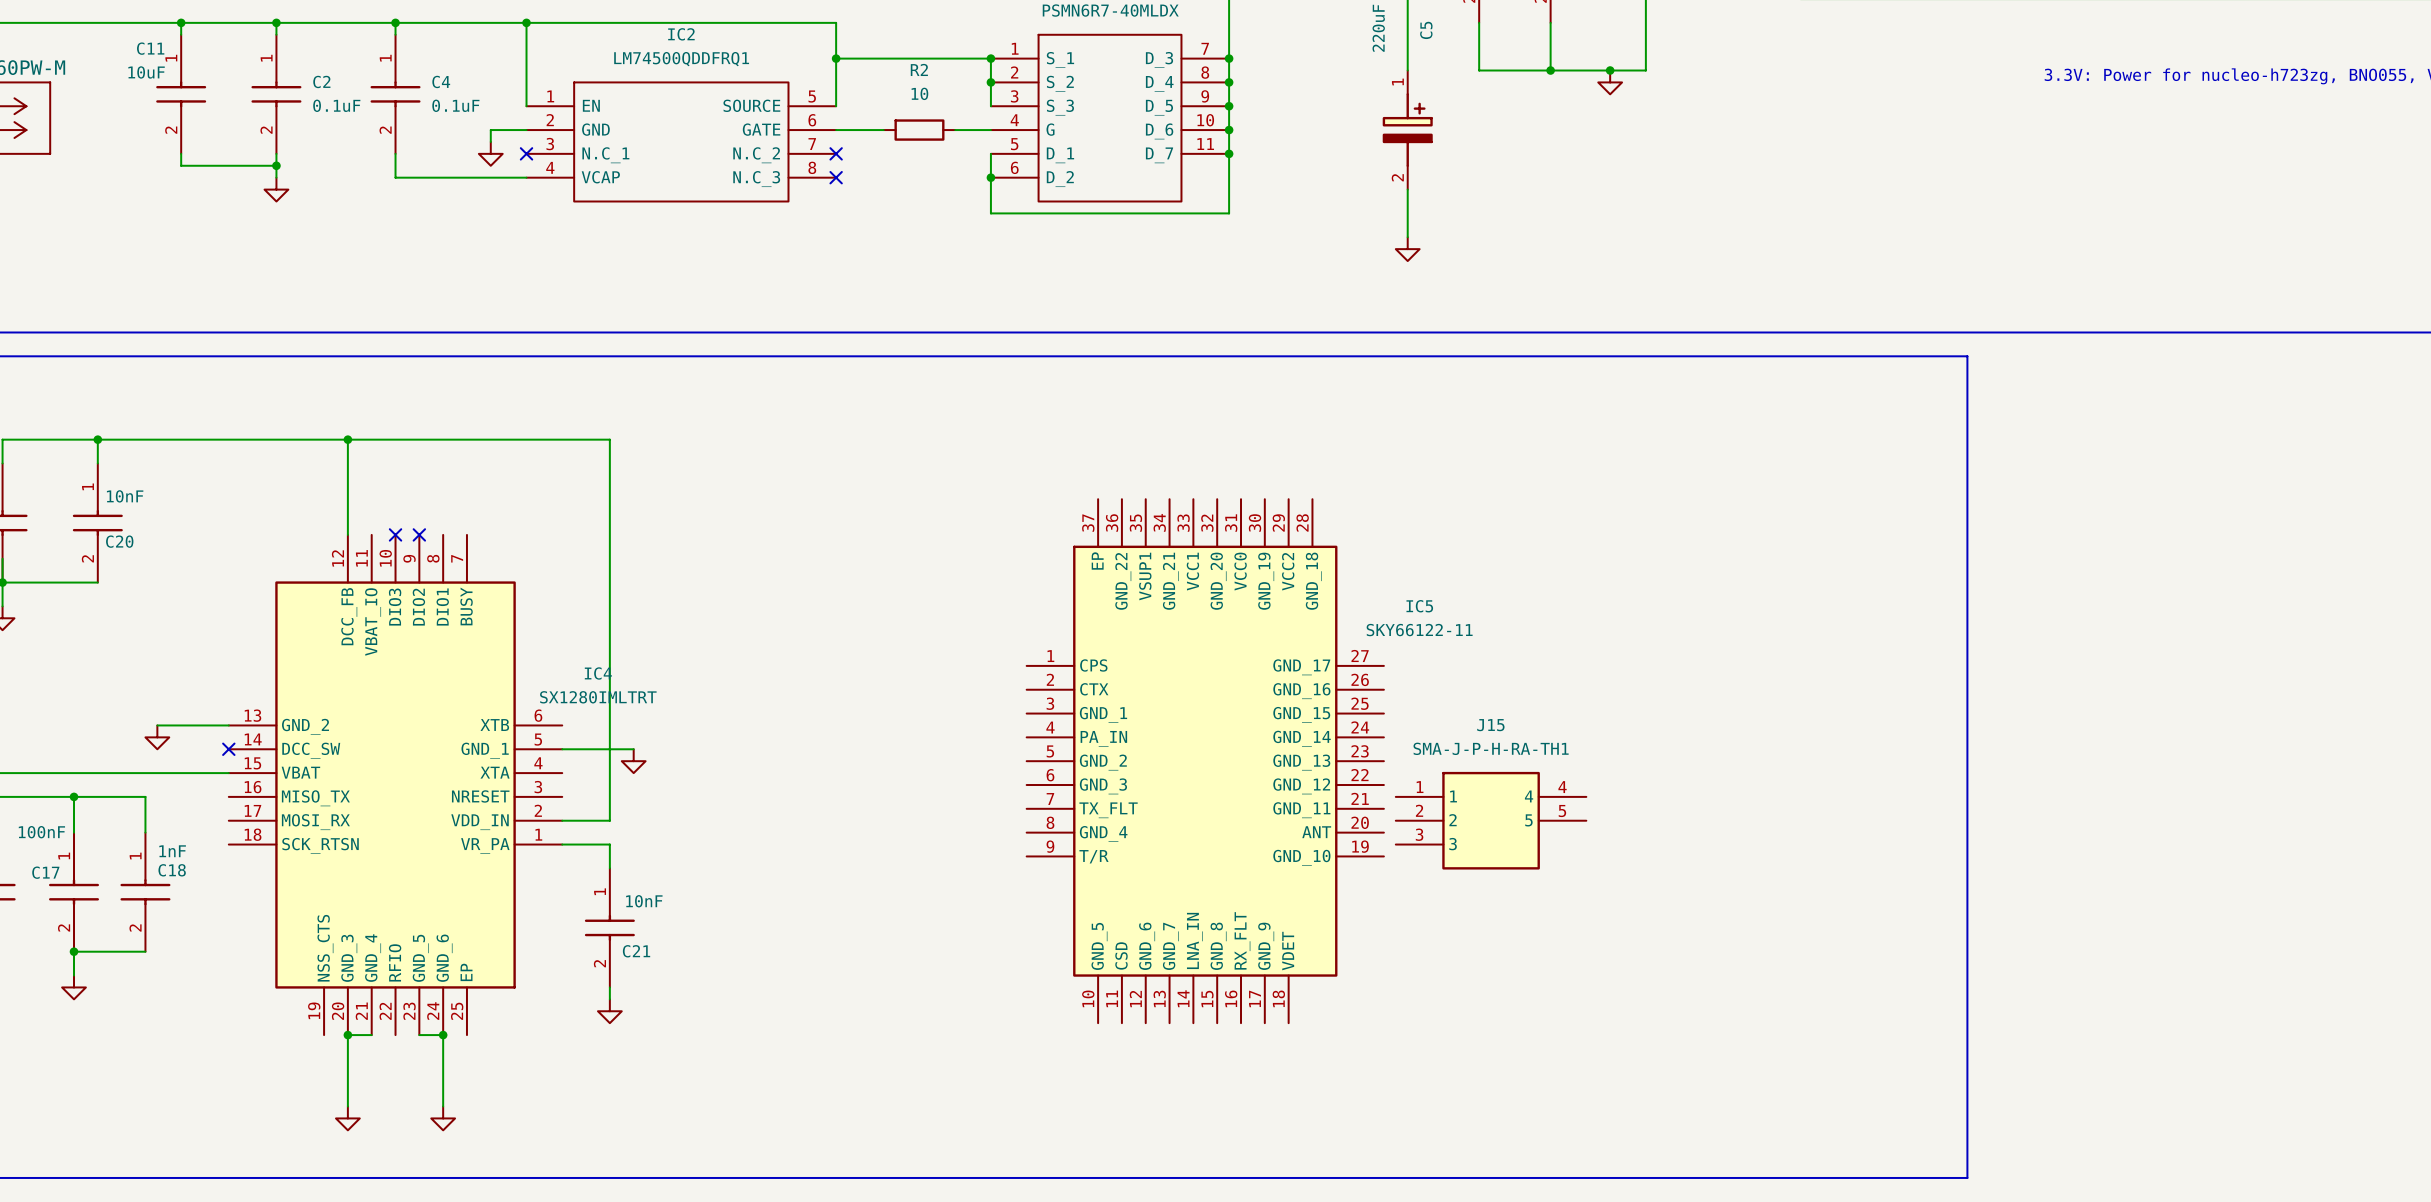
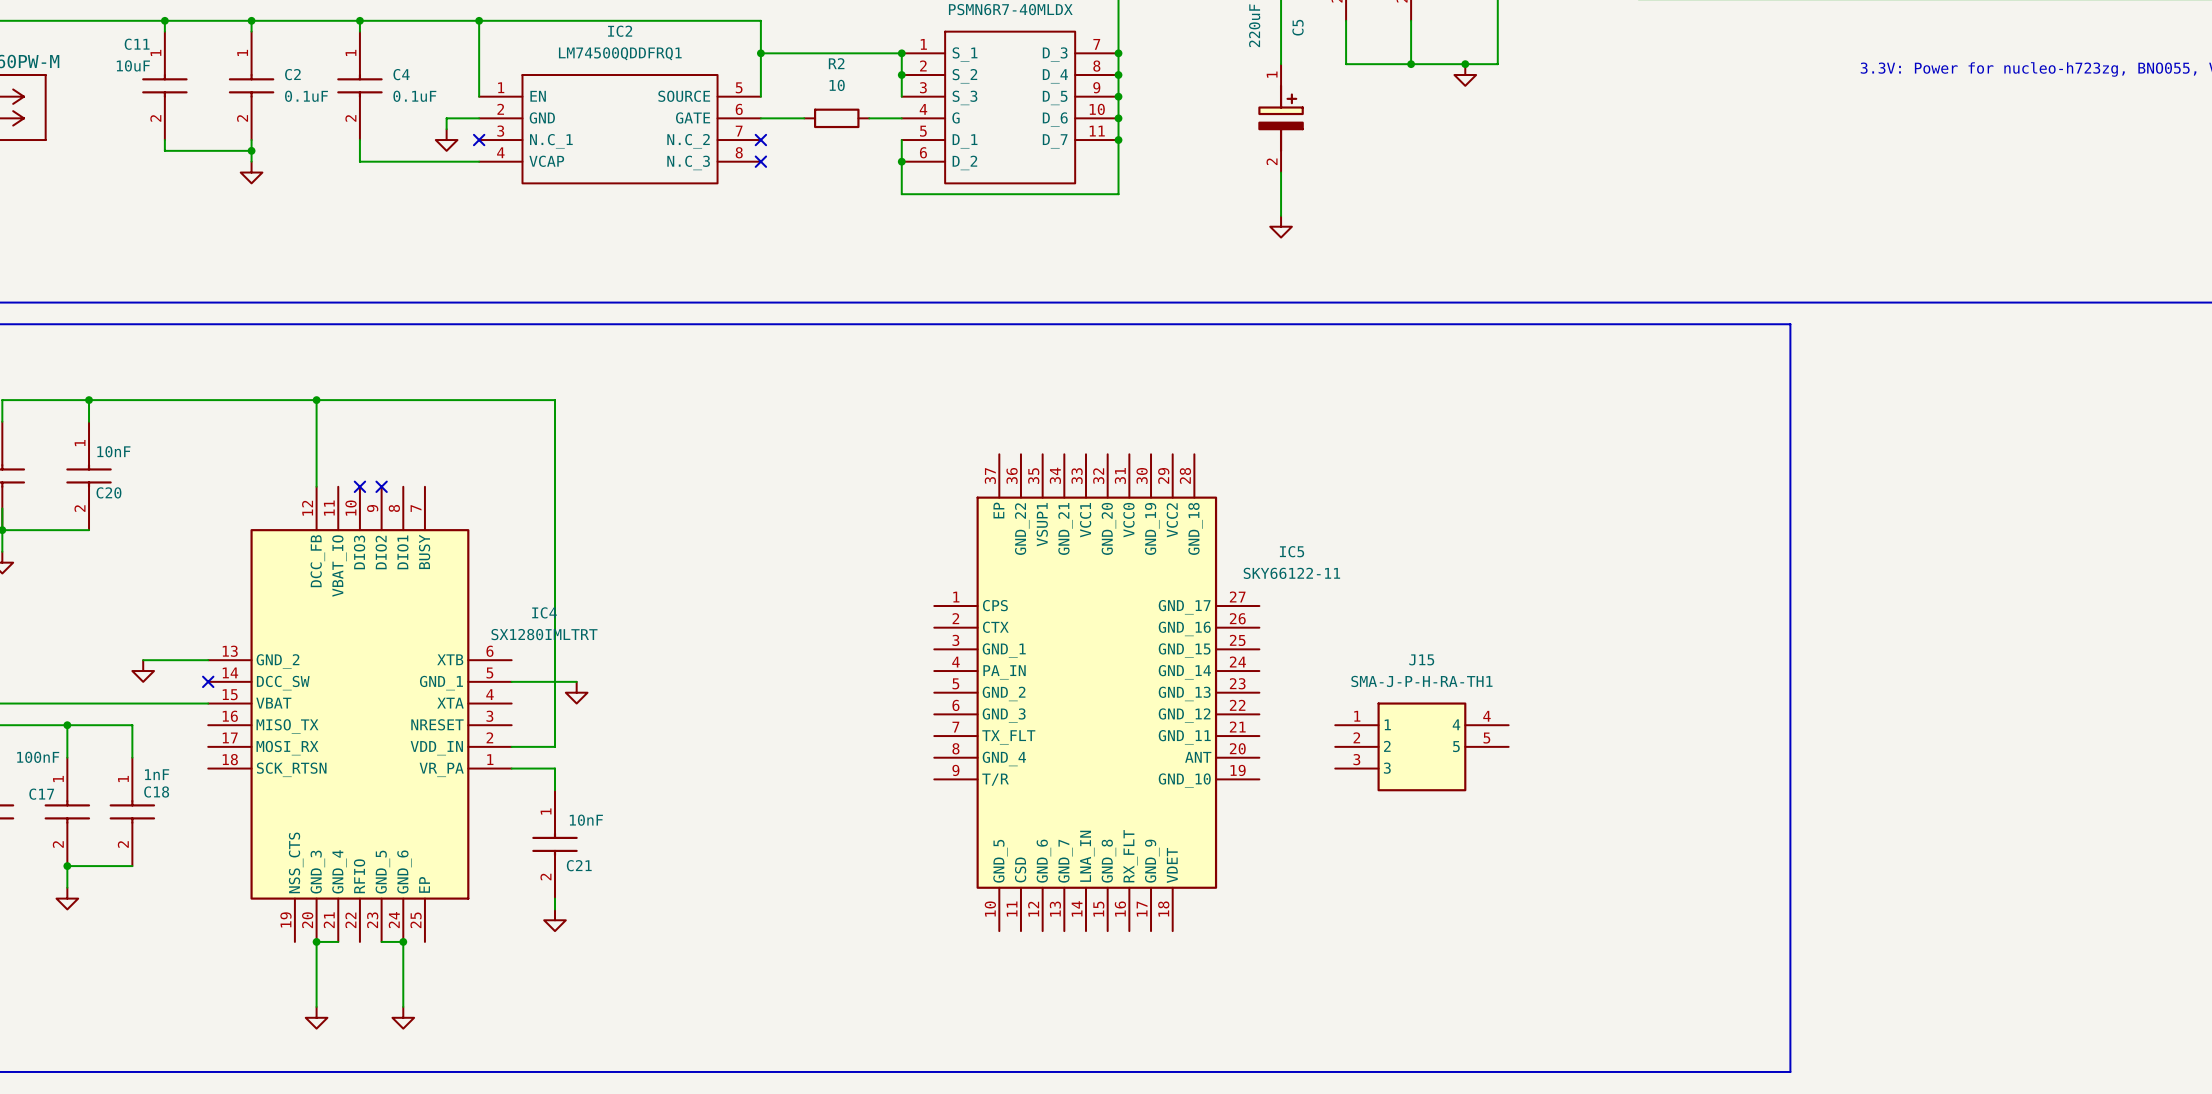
J15 position: (1491, 820) -> (1421, 746)

